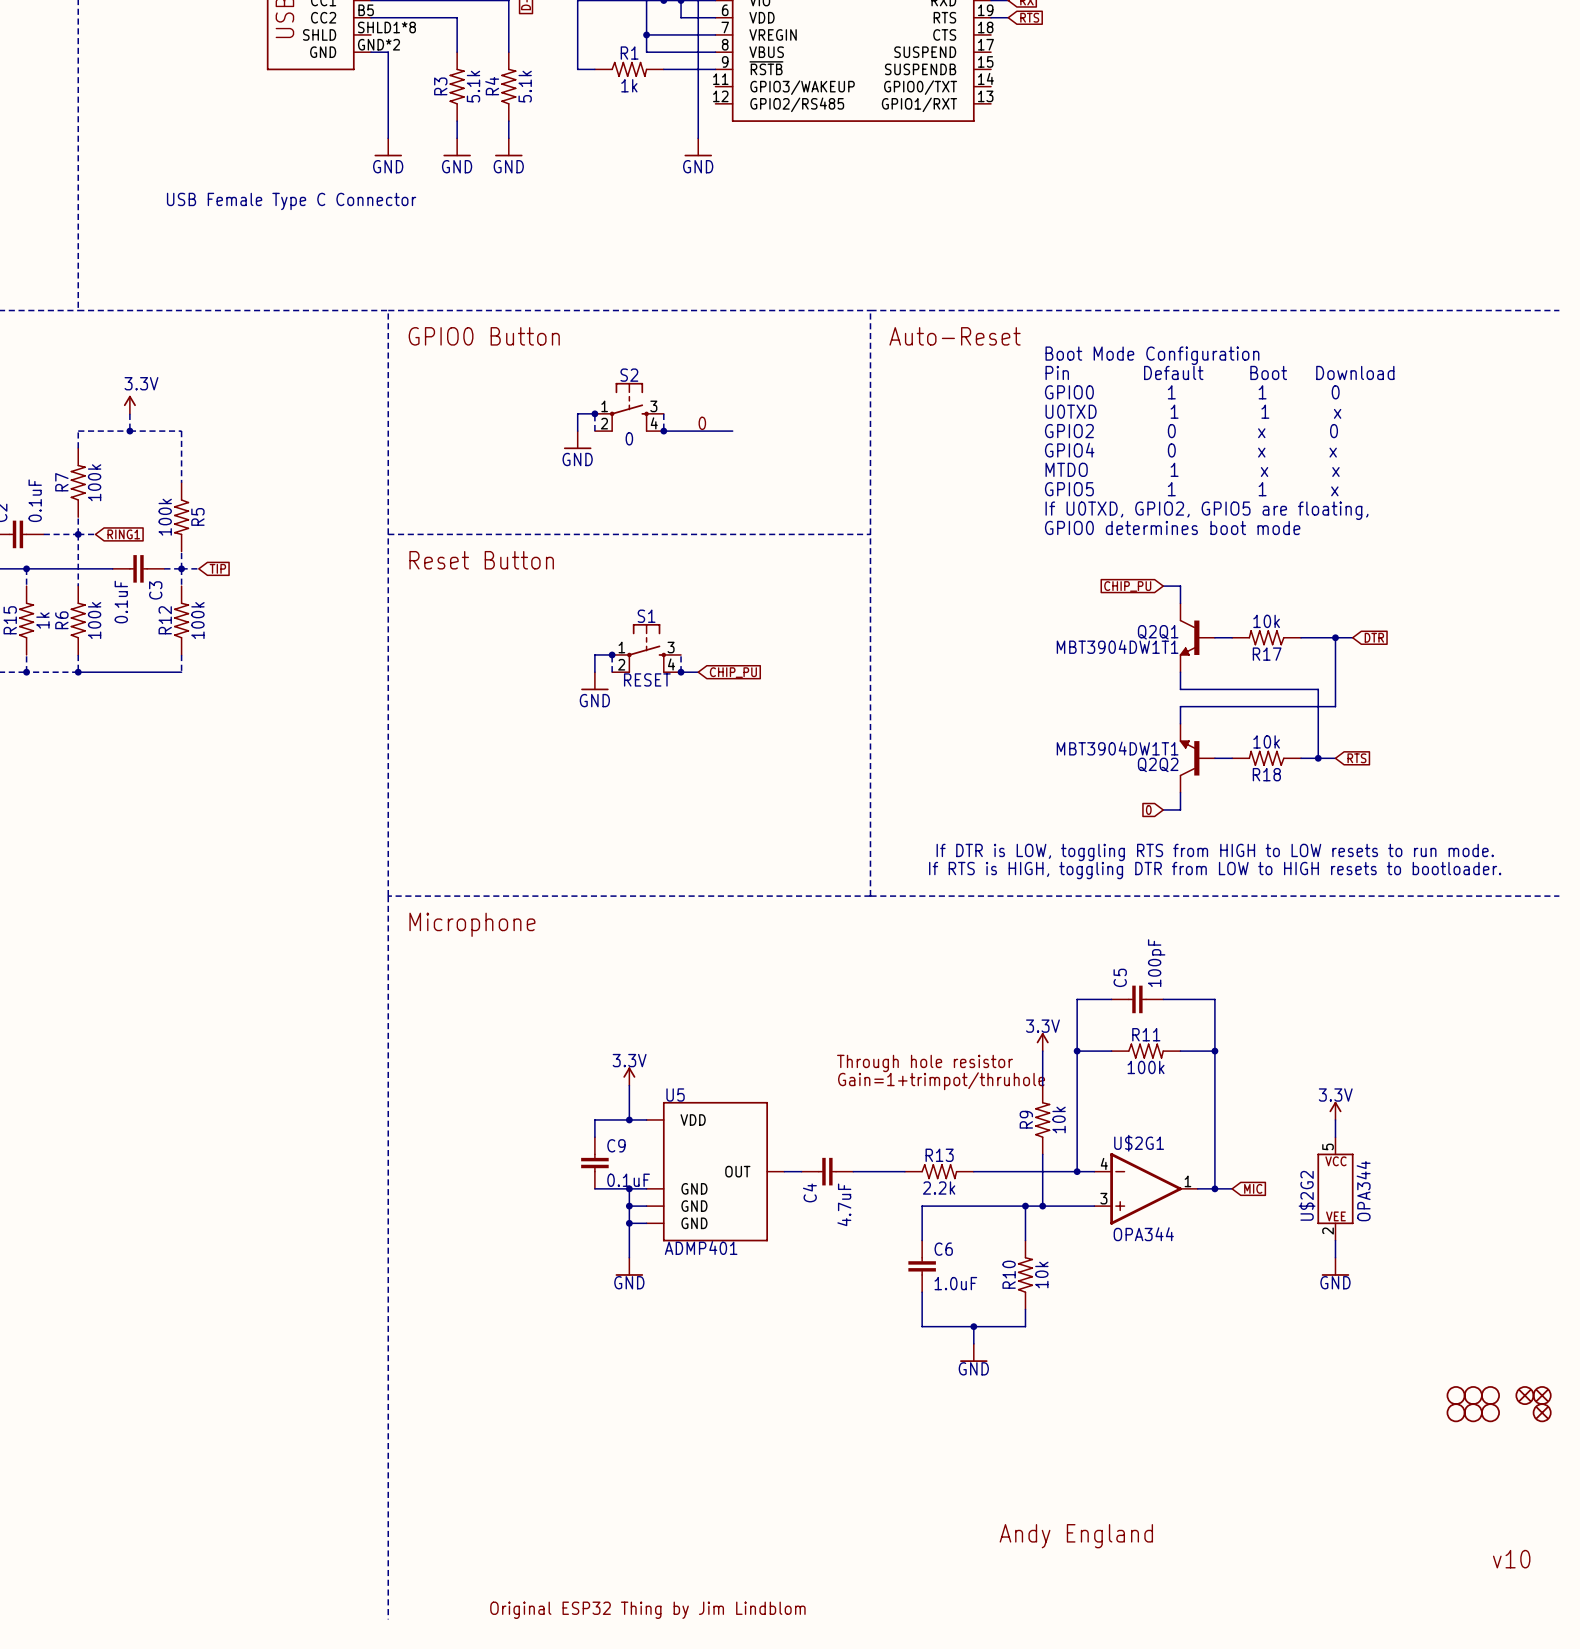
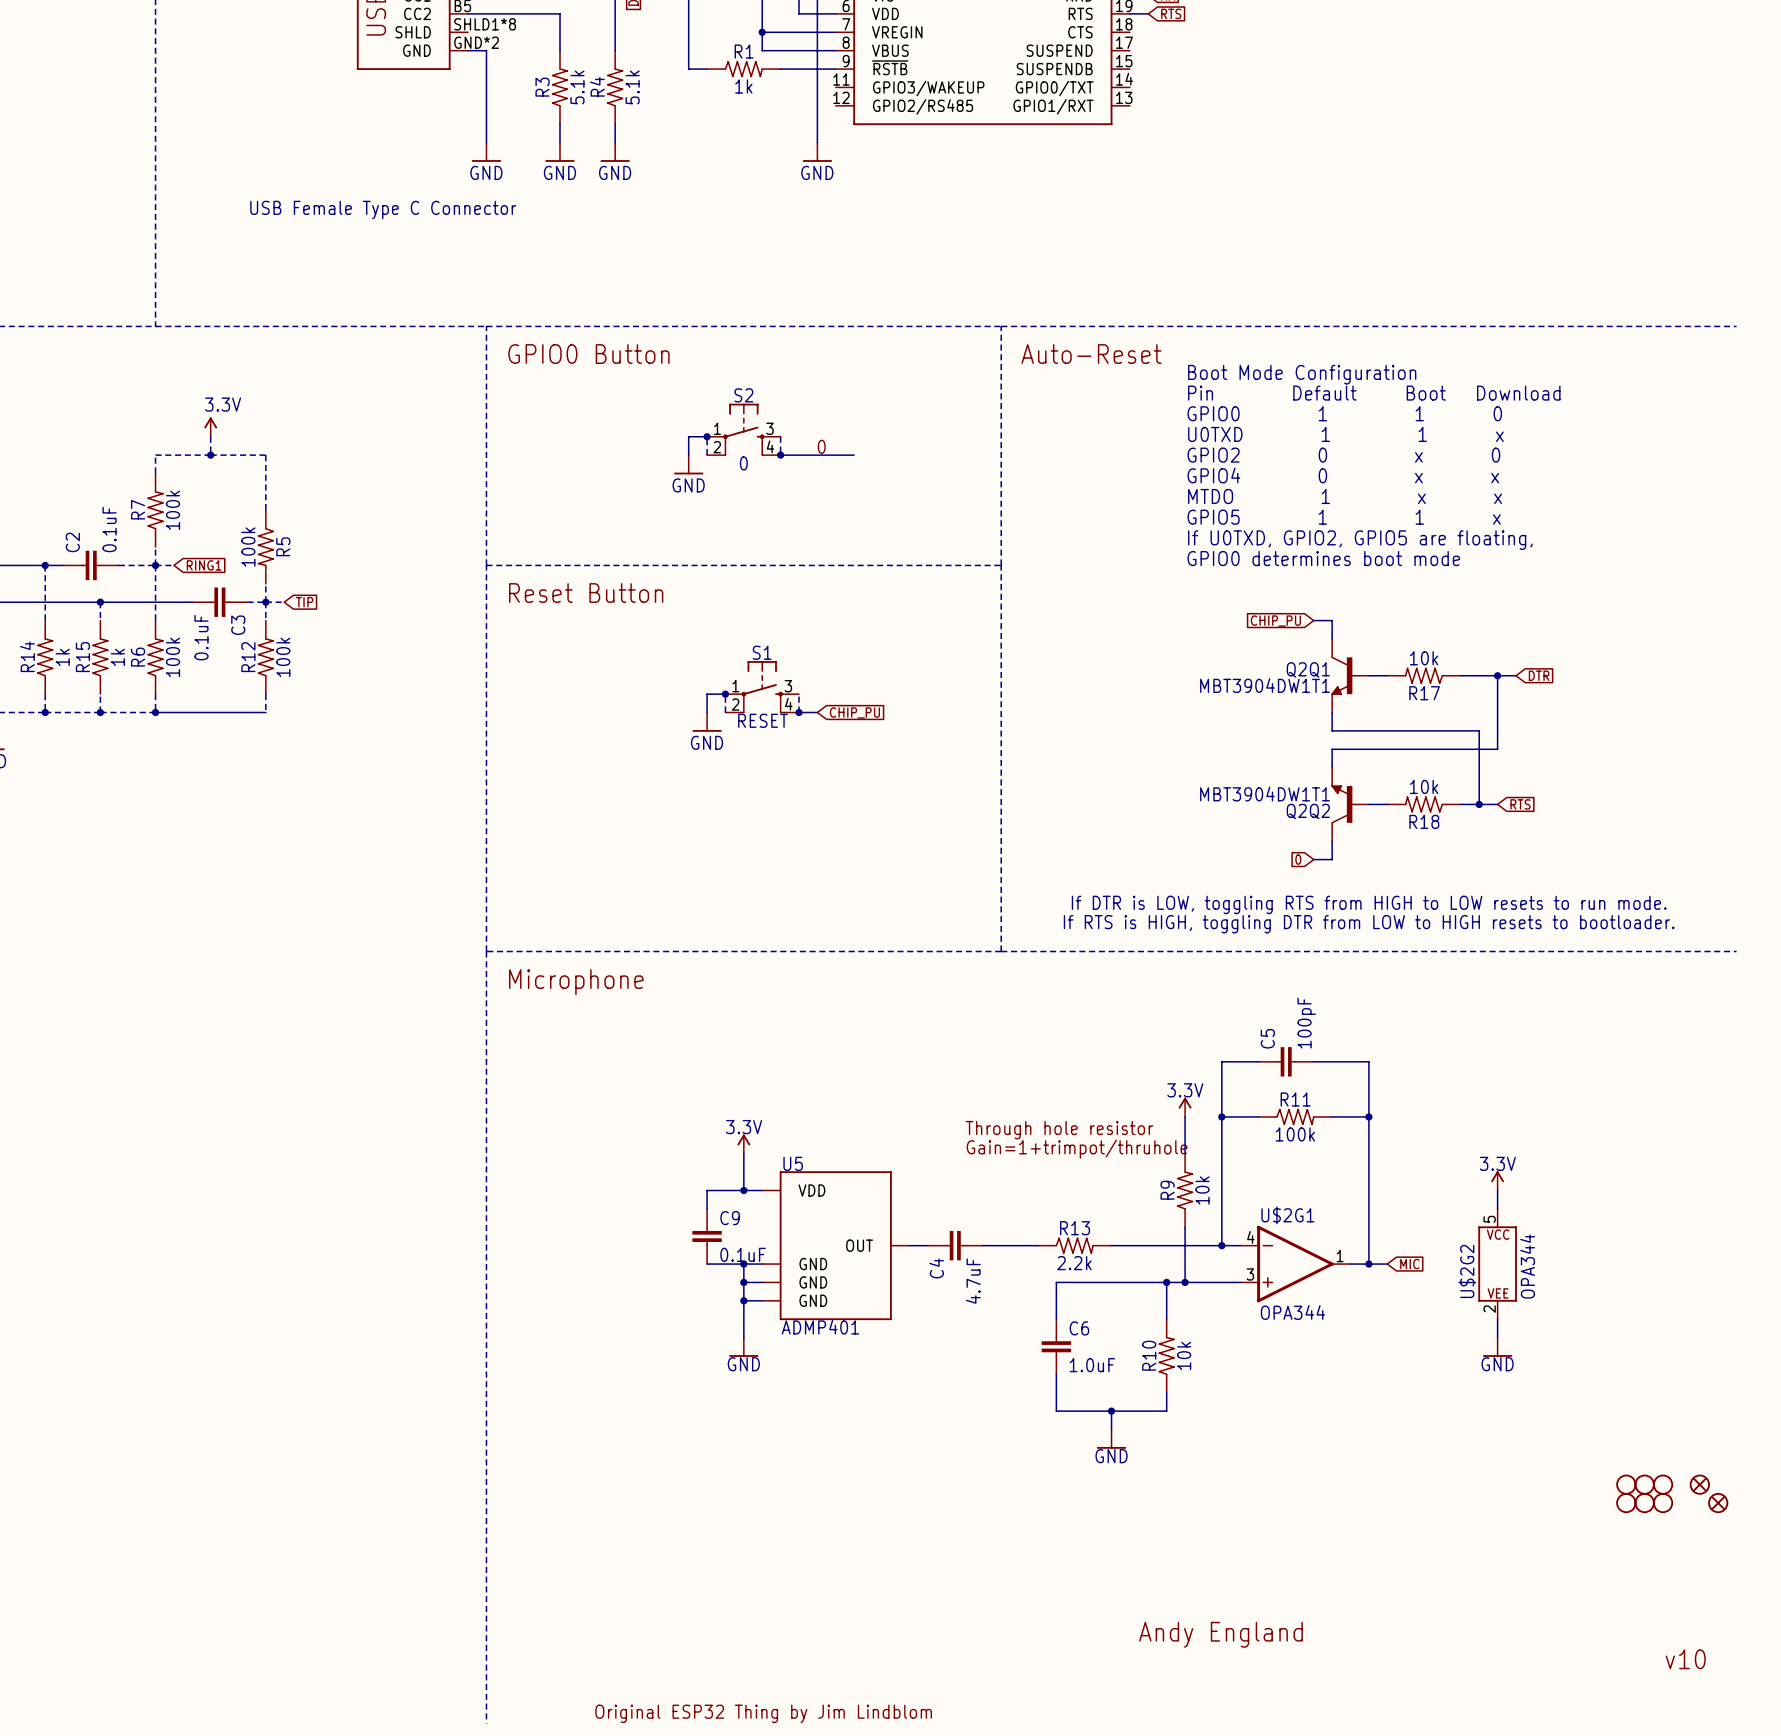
part: (1542, 1395) -> none

